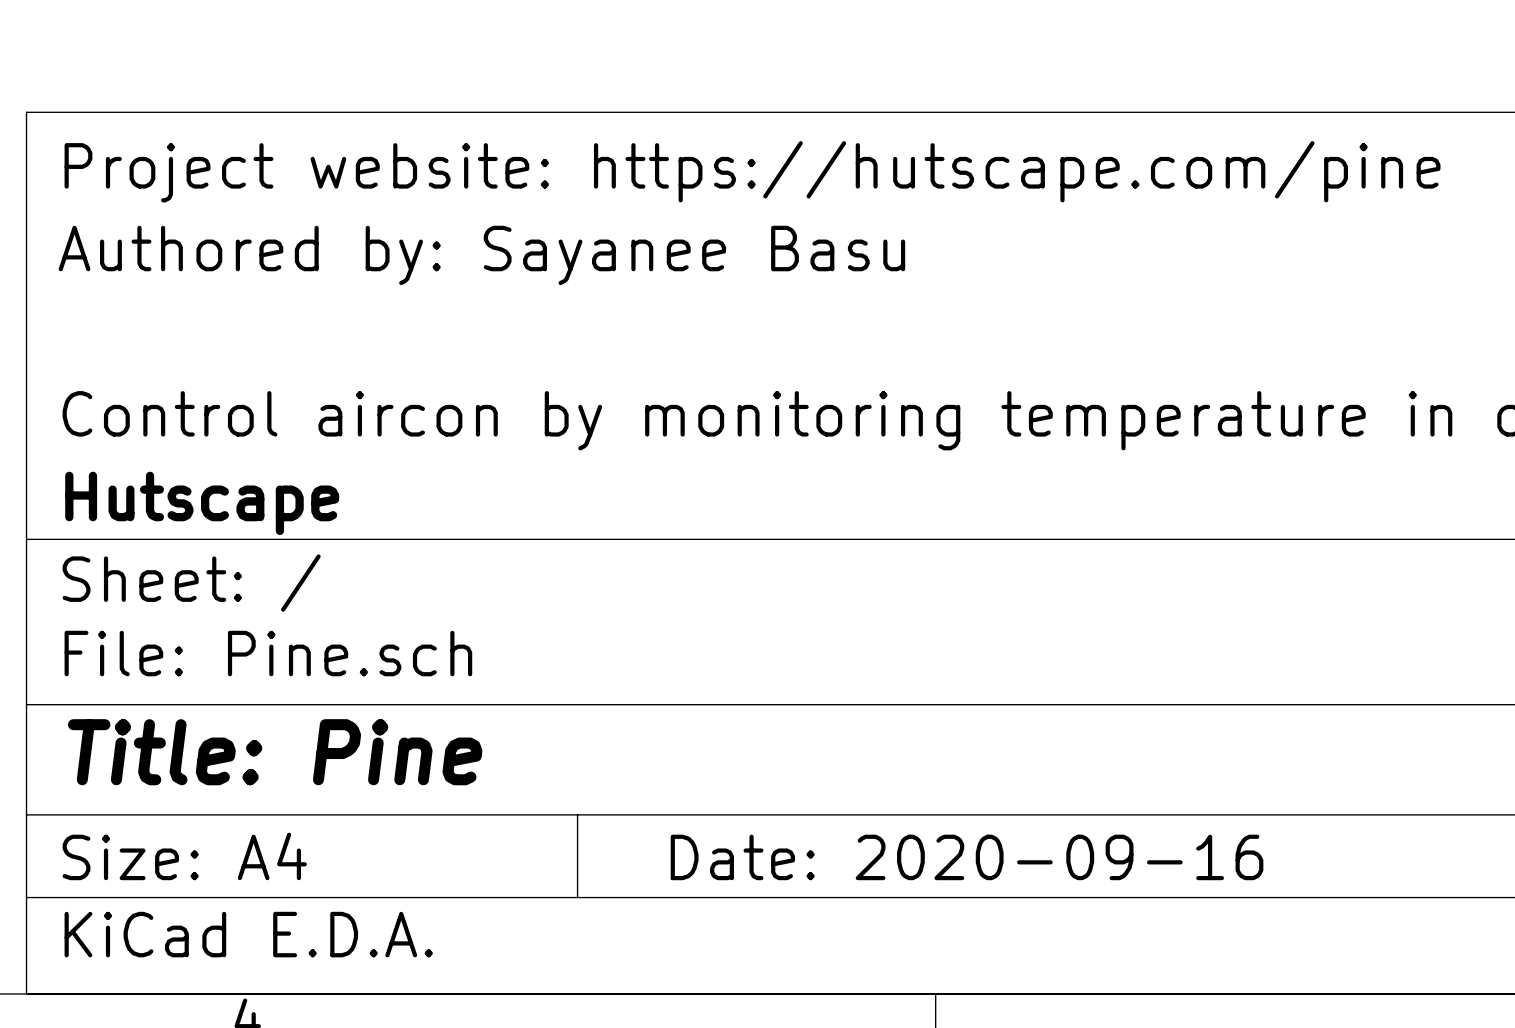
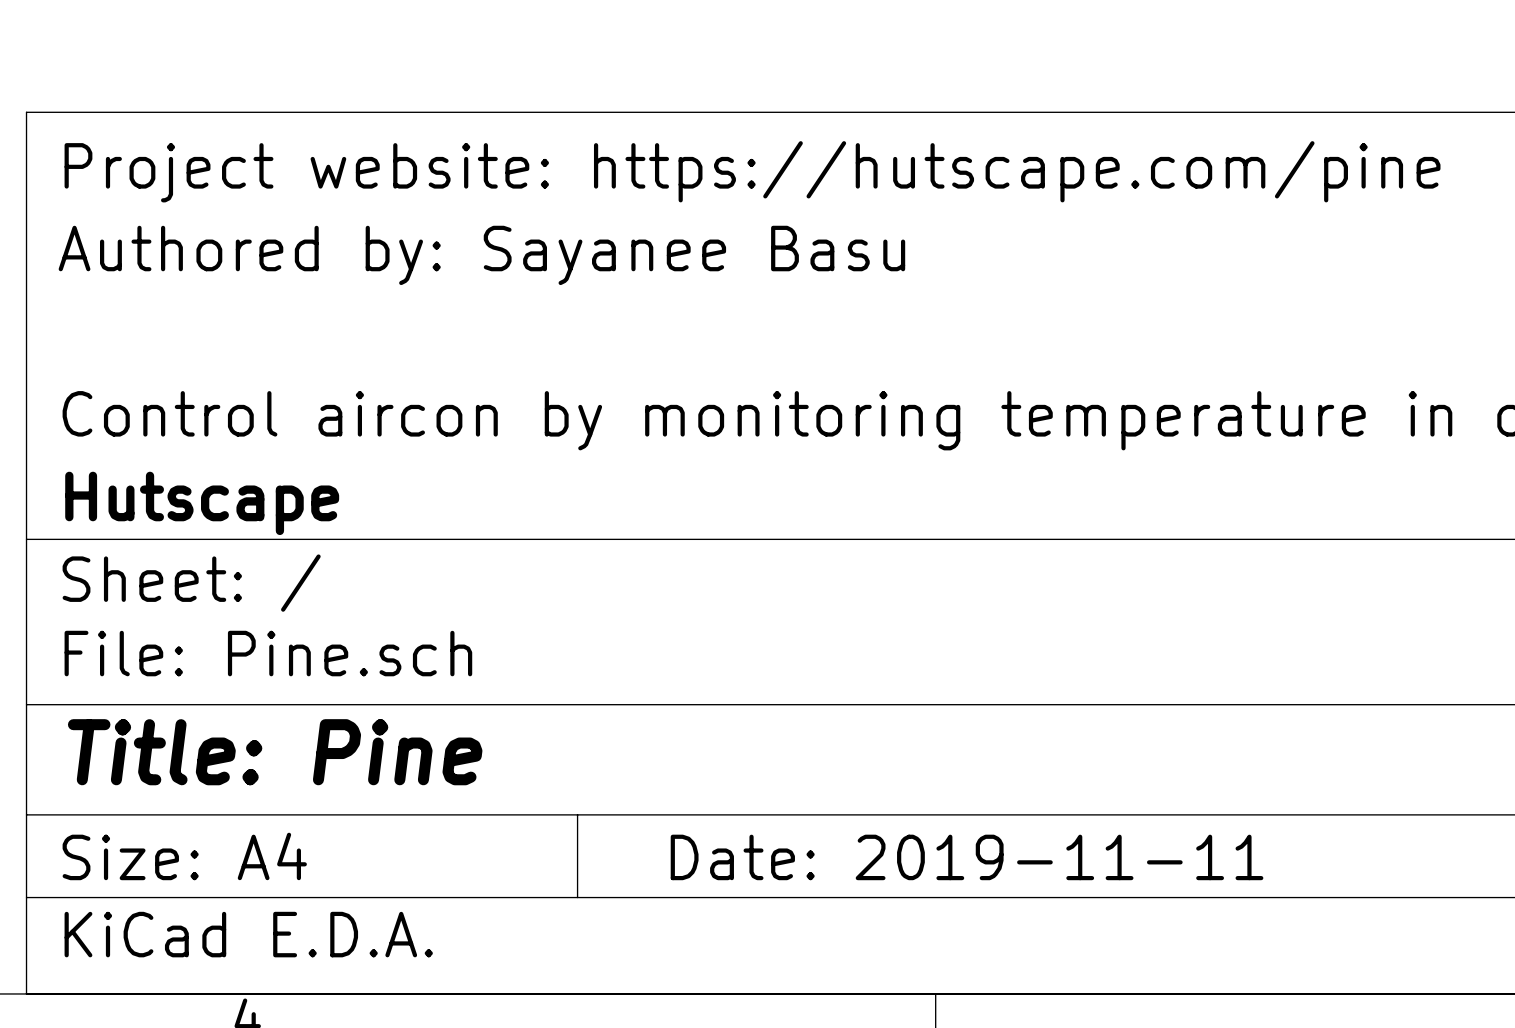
title block: Date: 2020-09-16 (967, 857) -> Date: 2019-11-11 (967, 857)

